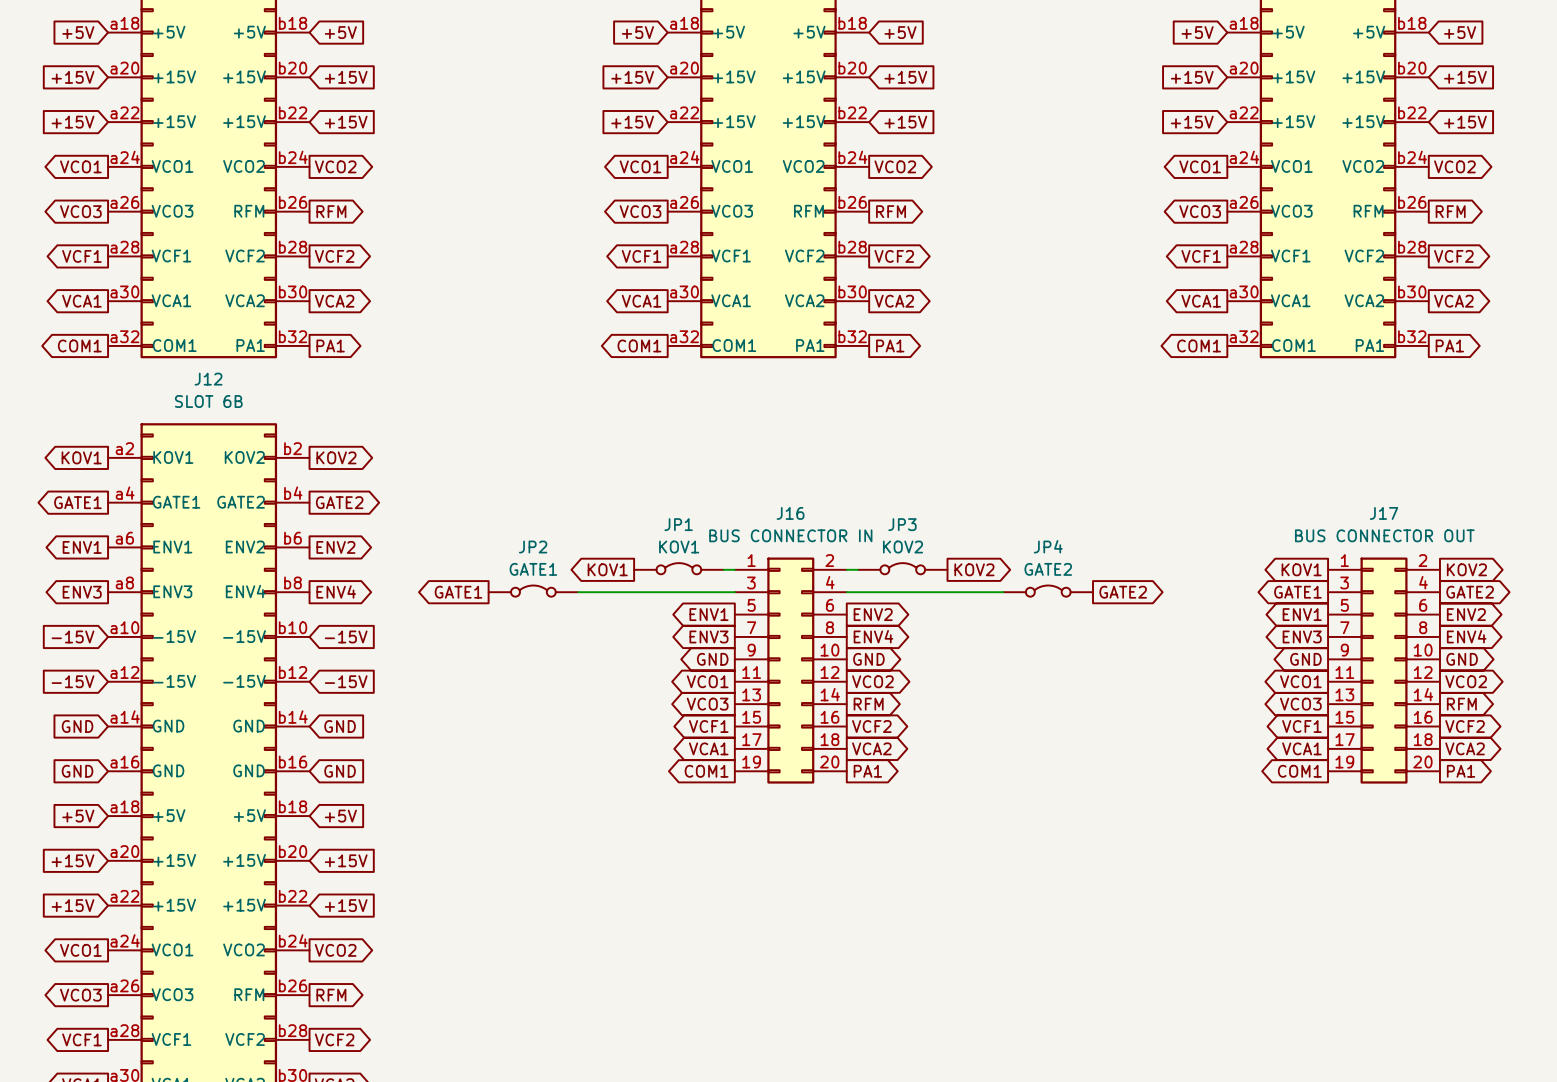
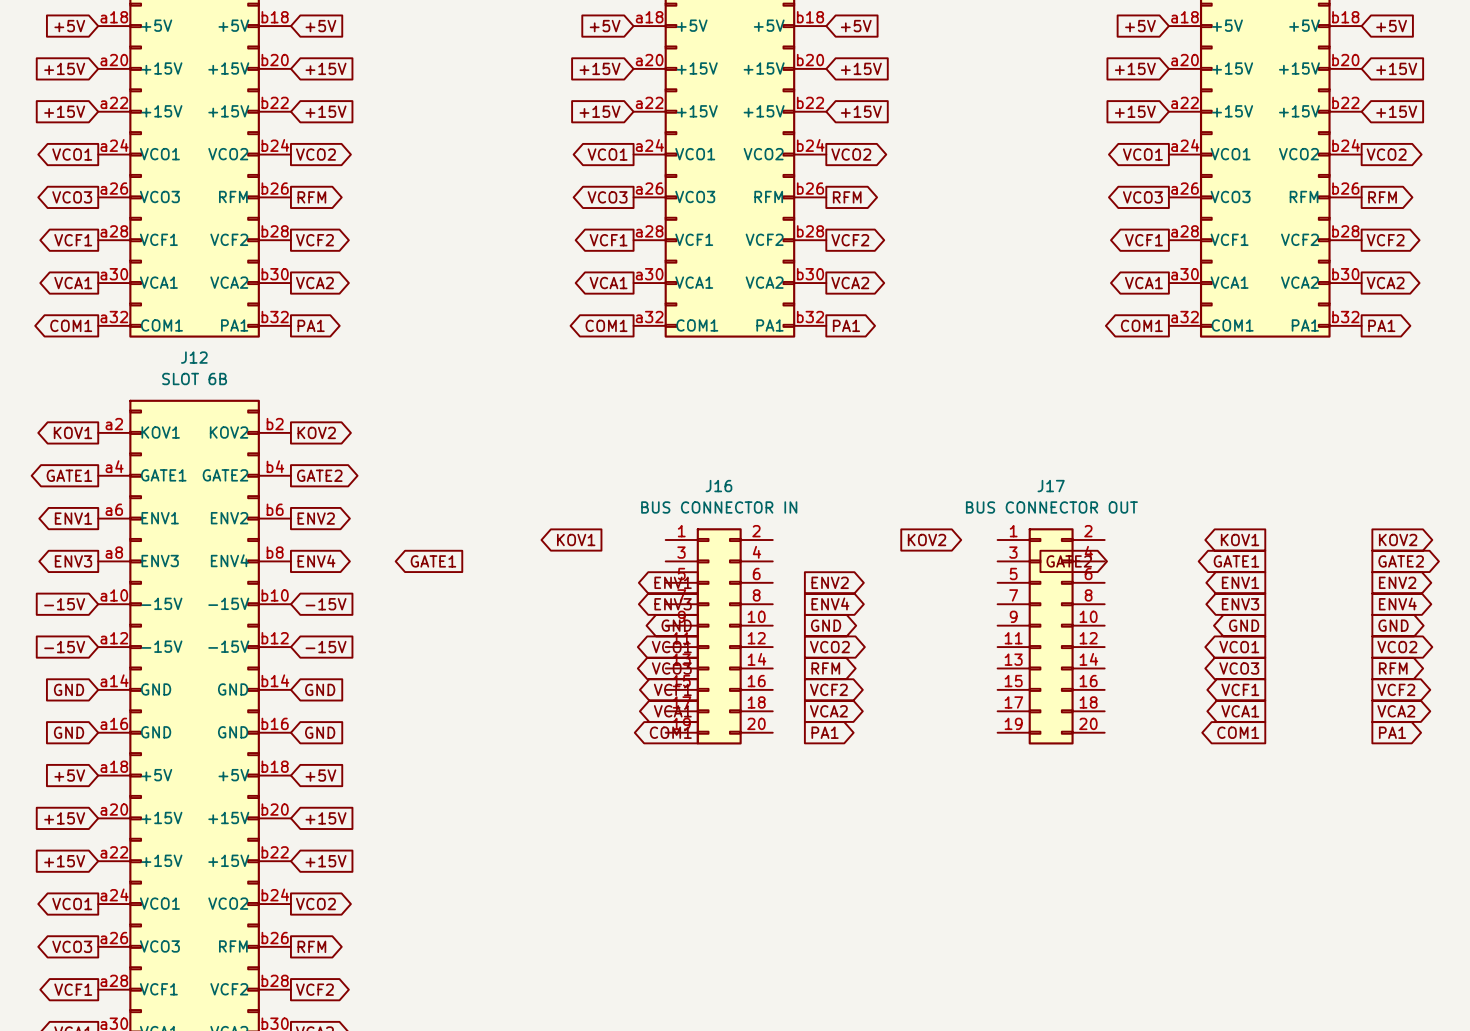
JP1: KOV1 (678, 568) -> none
JP3: KOV2 (902, 568) -> none
wire: (846, 569) (857, 569) -> none
JP2: GATE1 (533, 591) -> none
JP4: GATE2 (1048, 591) -> none
wire: (578, 592) (734, 592) -> none
wire: (846, 592) (1003, 592) -> none
J16 position: (790, 670) -> (719, 636)
J17 position: (1384, 670) -> (1051, 636)

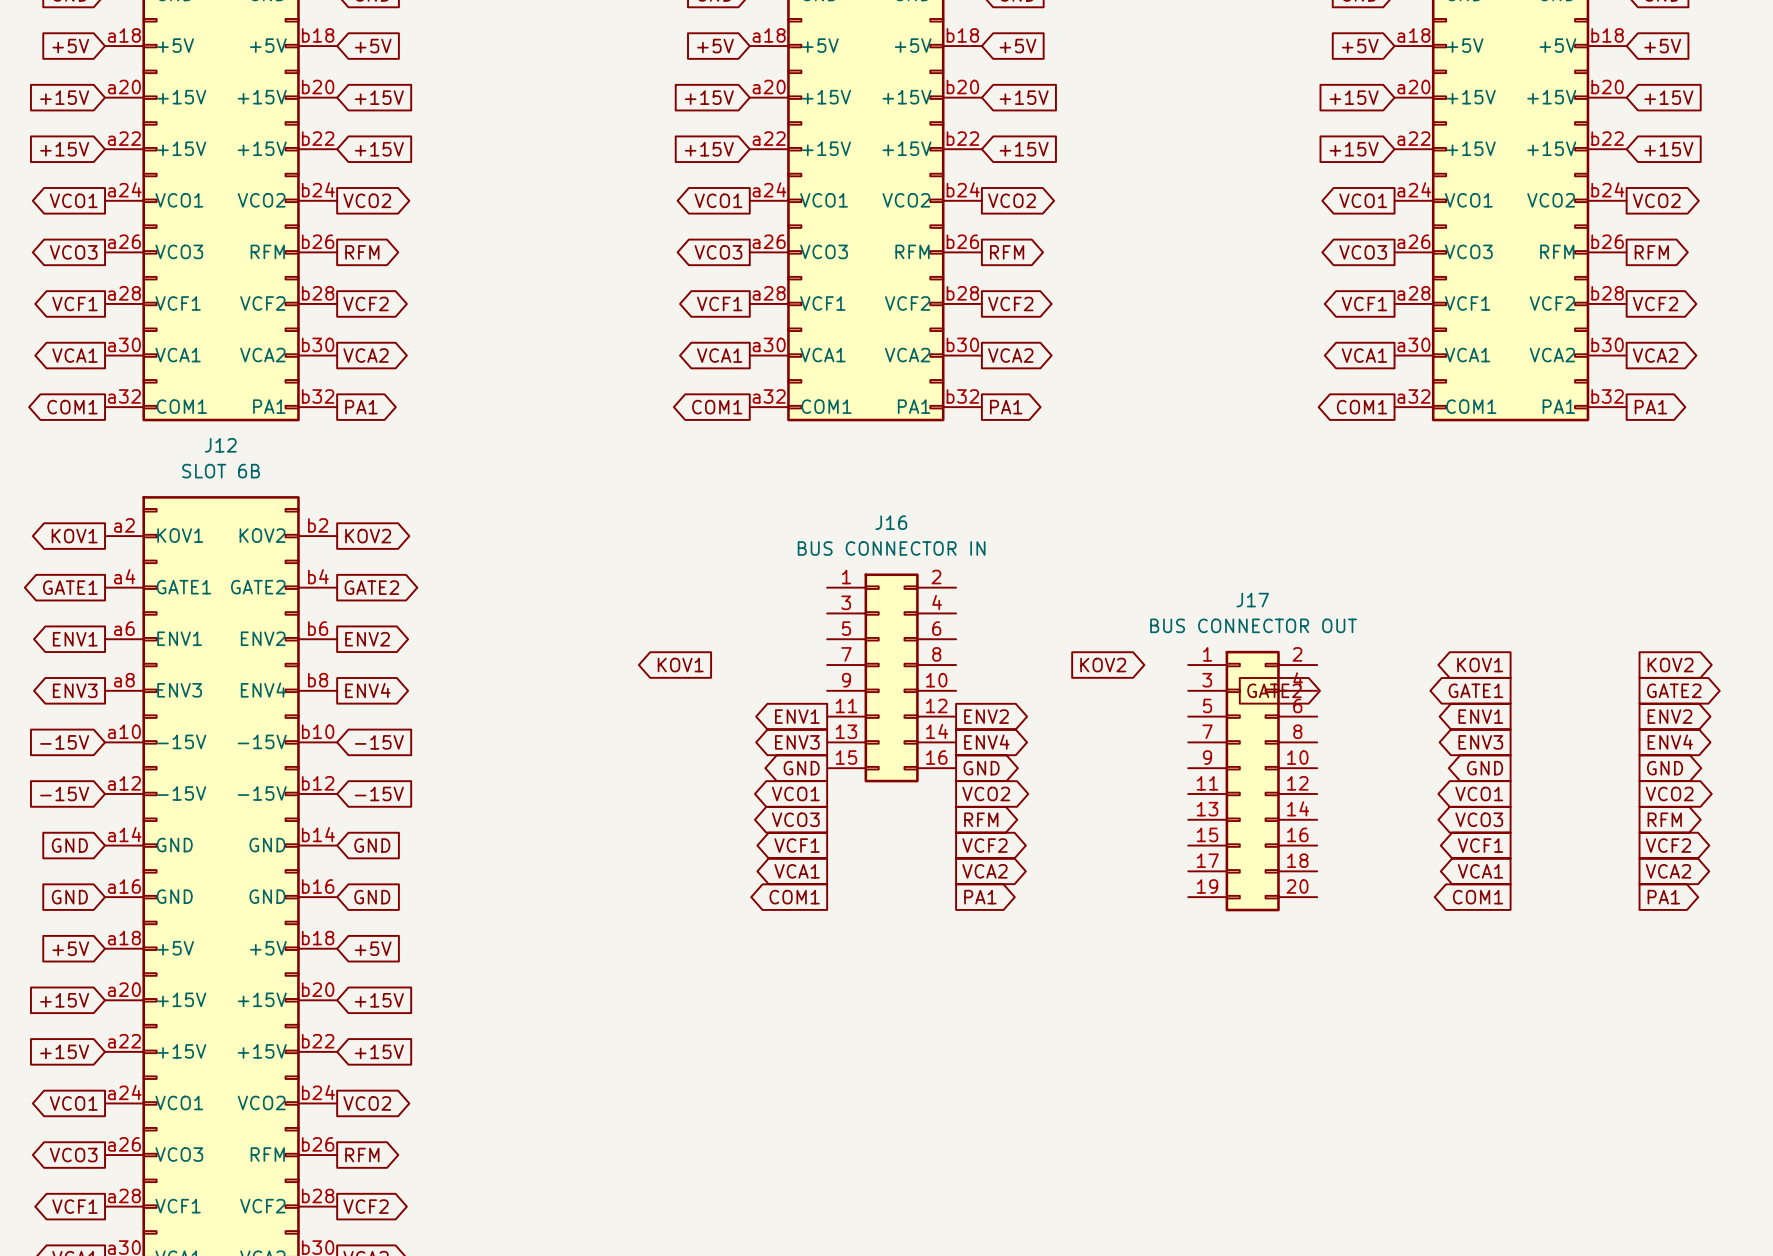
J16 name position: J16 (718, 486) -> J16 (891, 522)
J16 value position: BUS CONNECTOR IN (719, 507) -> BUS CONNECTOR IN (891, 548)
J16 symbol: [665, 528, 773, 745] -> [827, 573, 957, 783]
global label: GATE1 (433, 561) -> none

